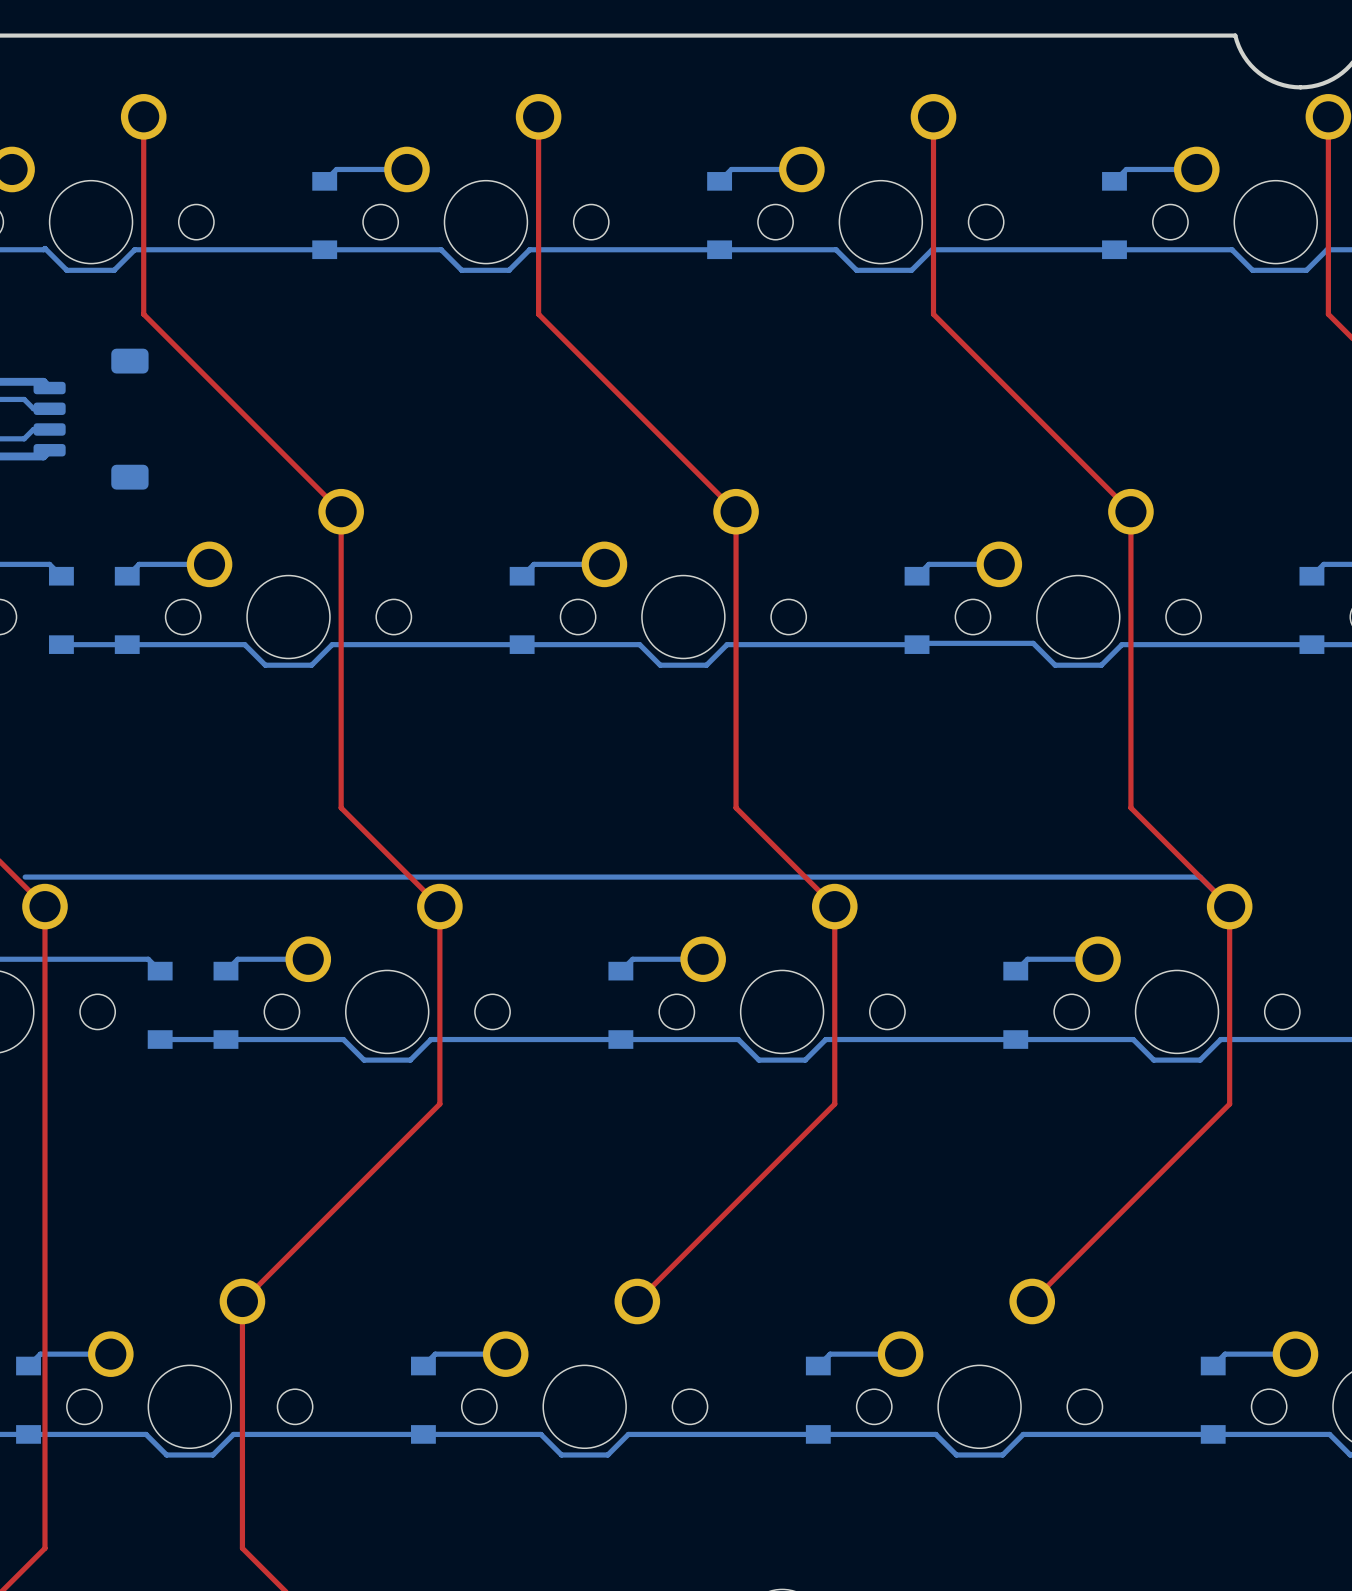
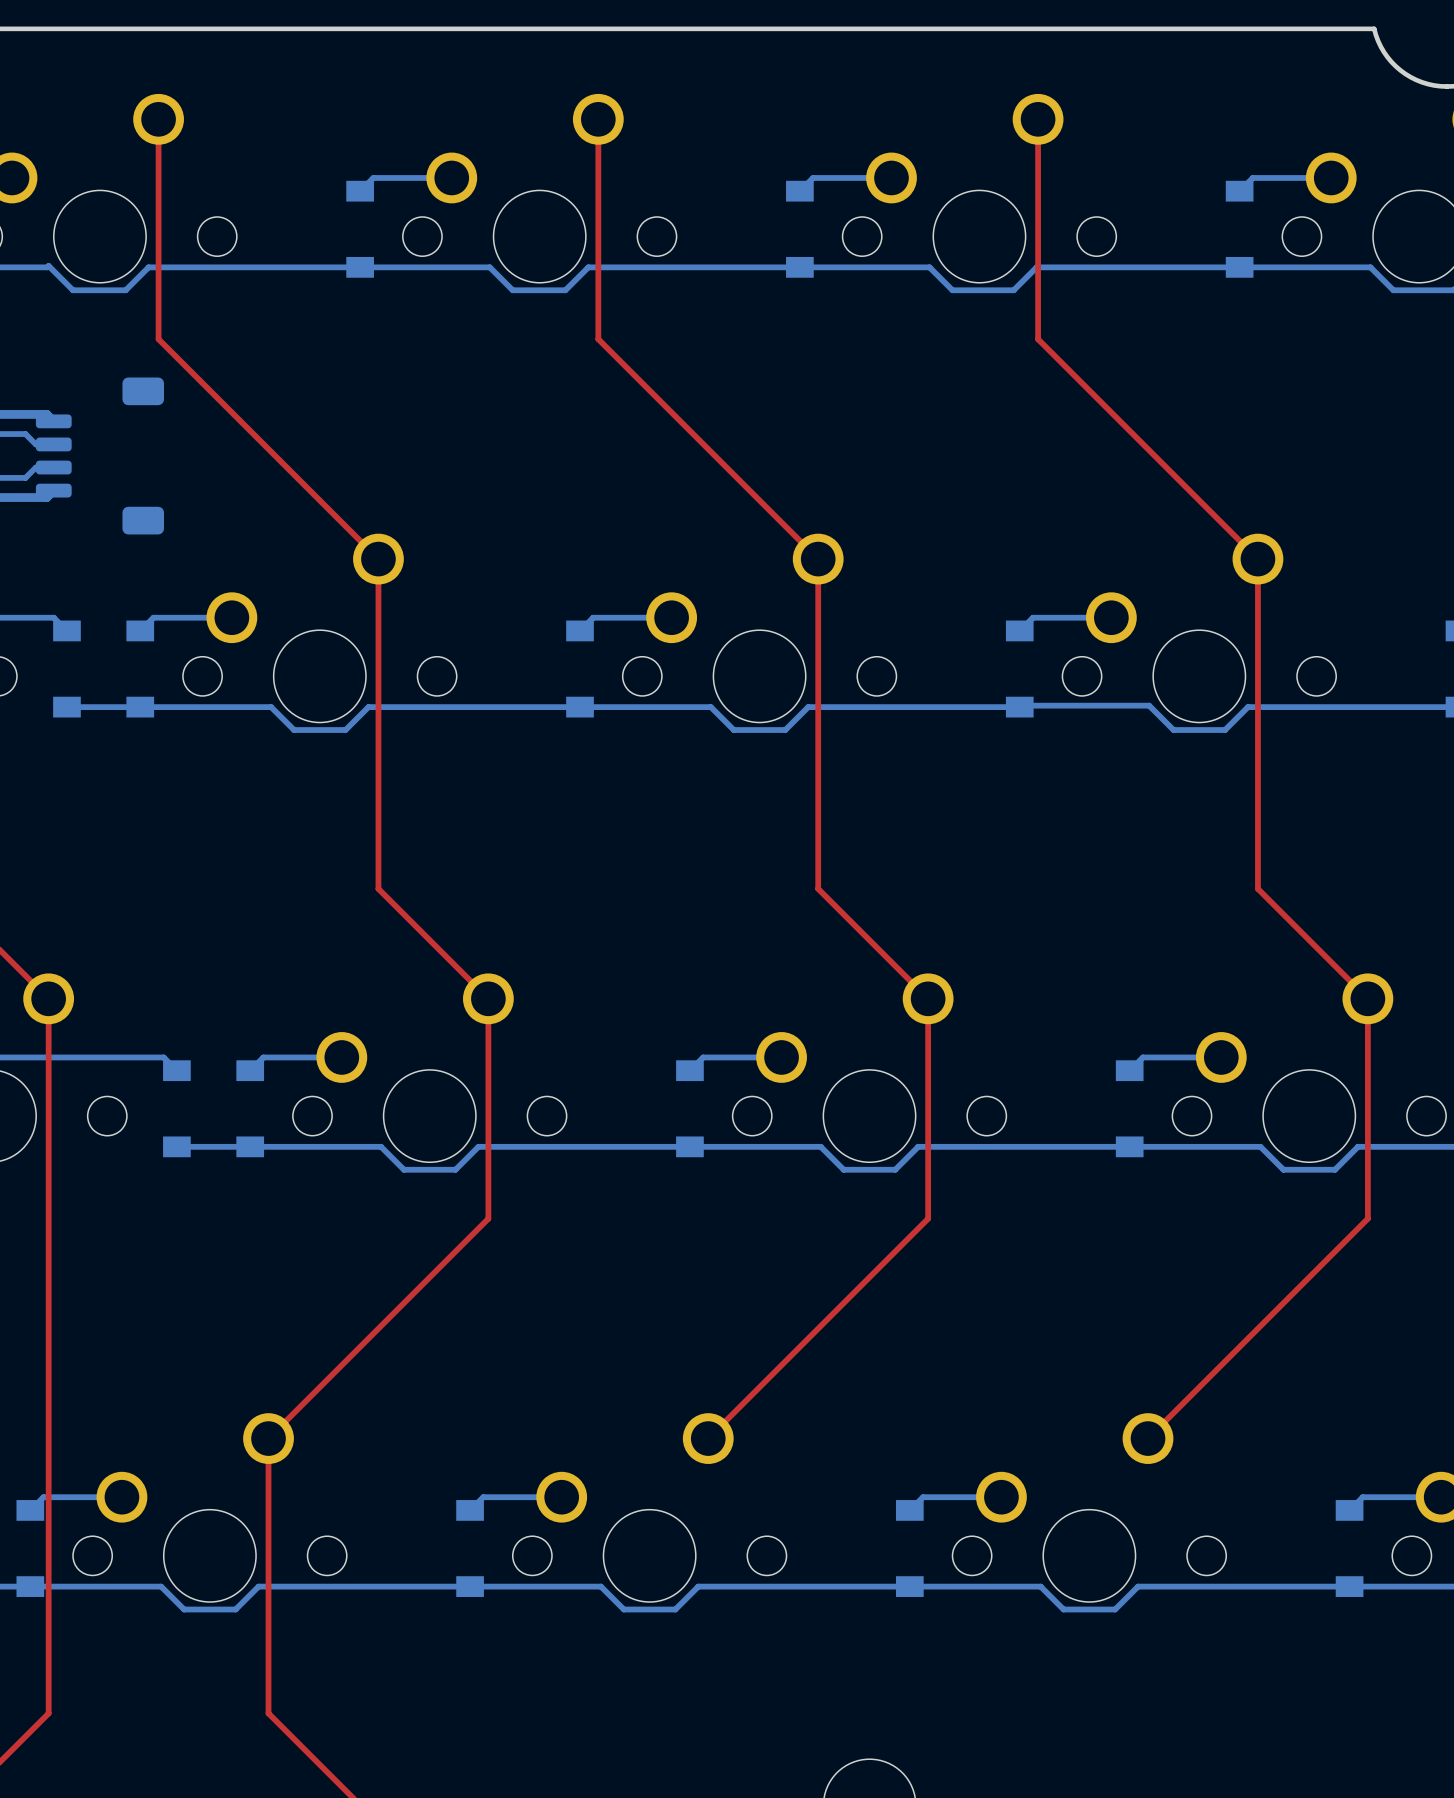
bottom track: (25, 877) (1200, 877) (1229, 906) -> none

